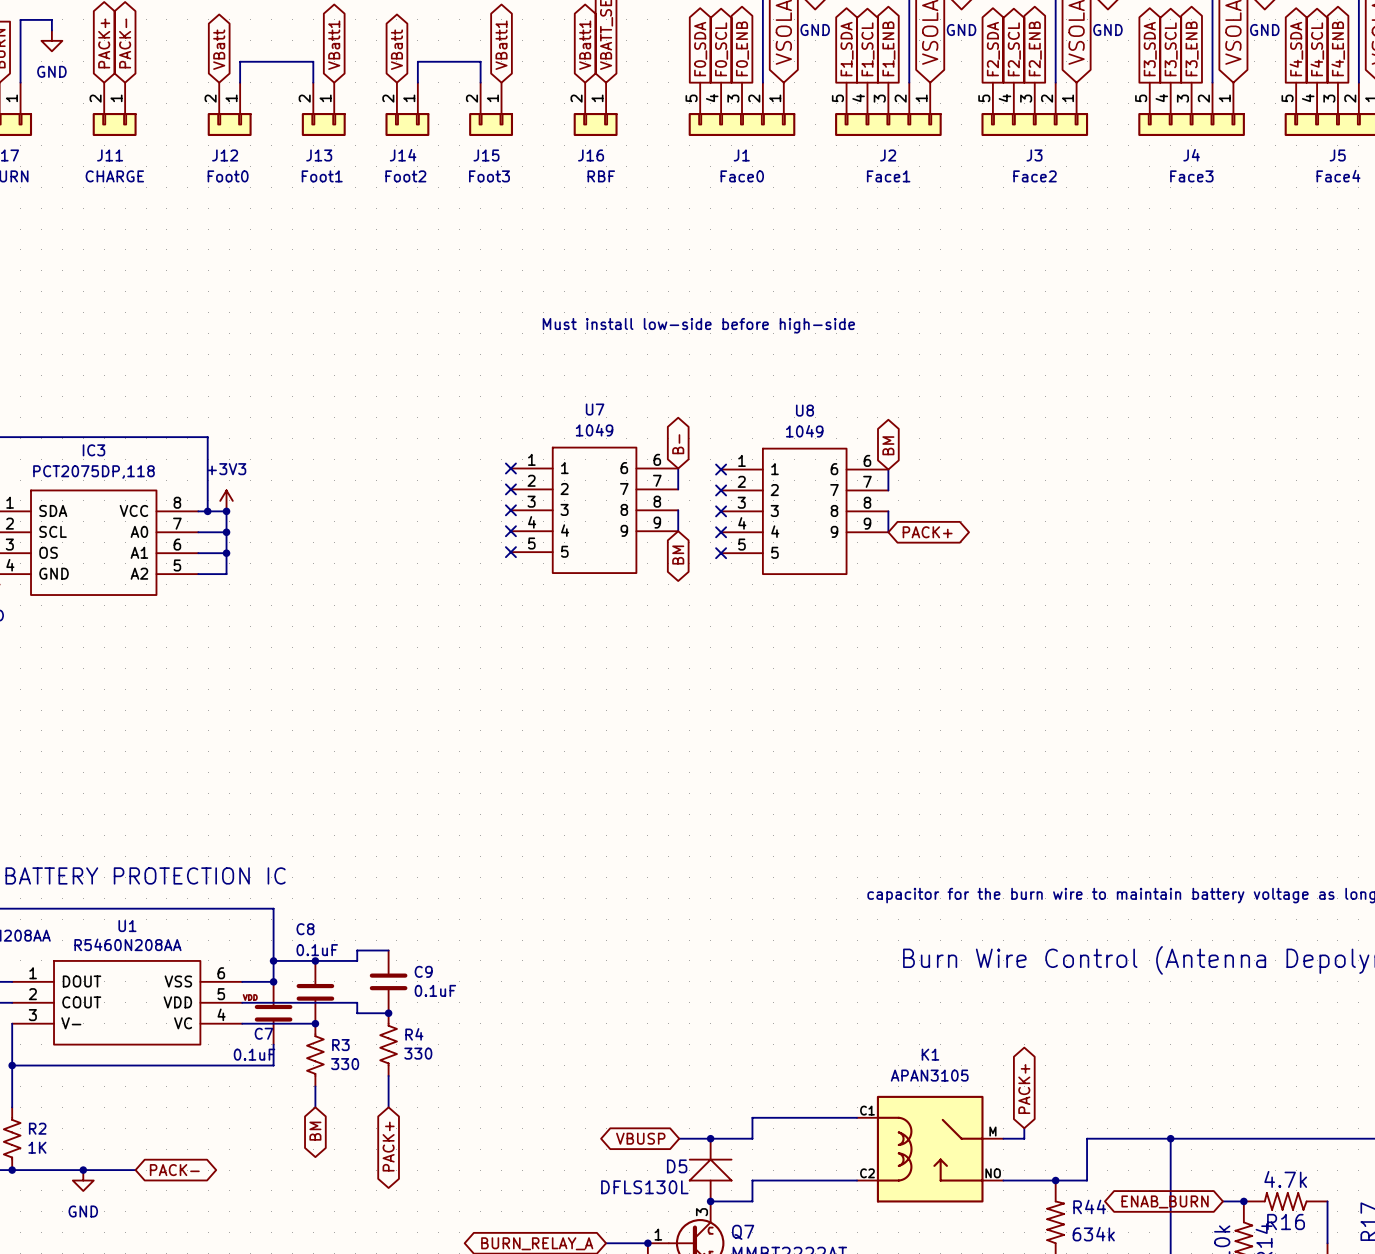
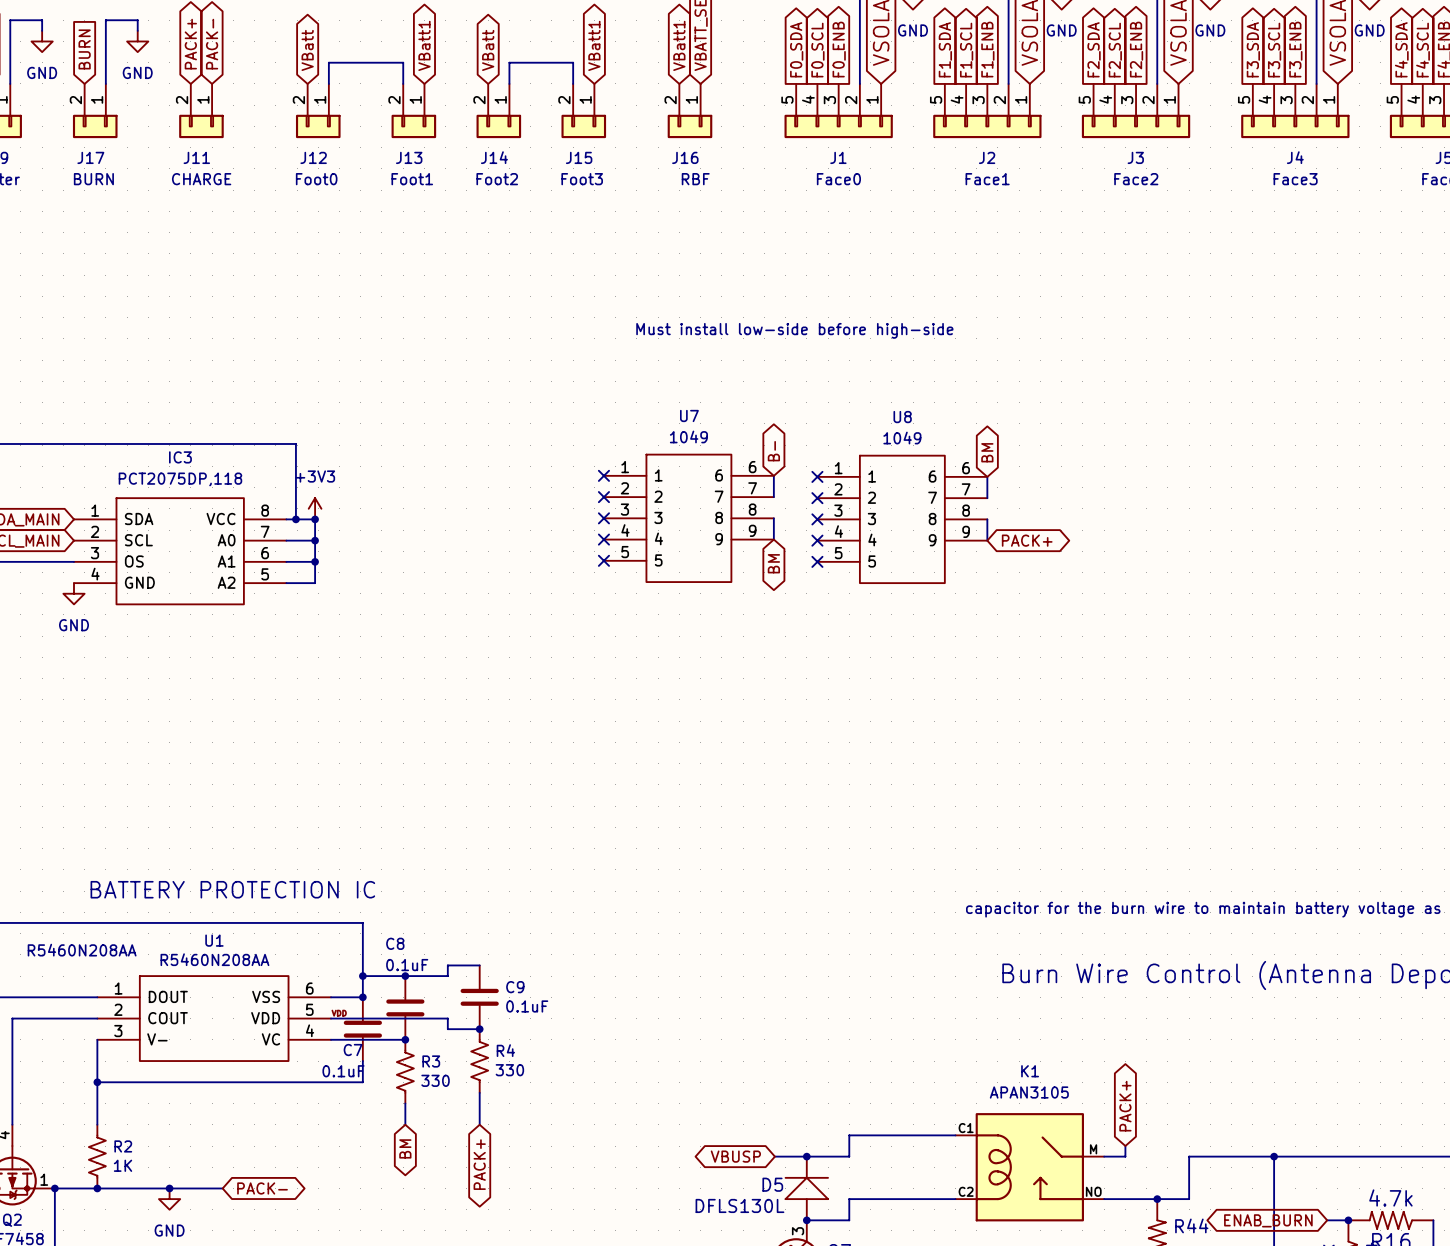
K1 symbol: [857, 1095, 1004, 1203] -> [955, 1113, 1105, 1222]

